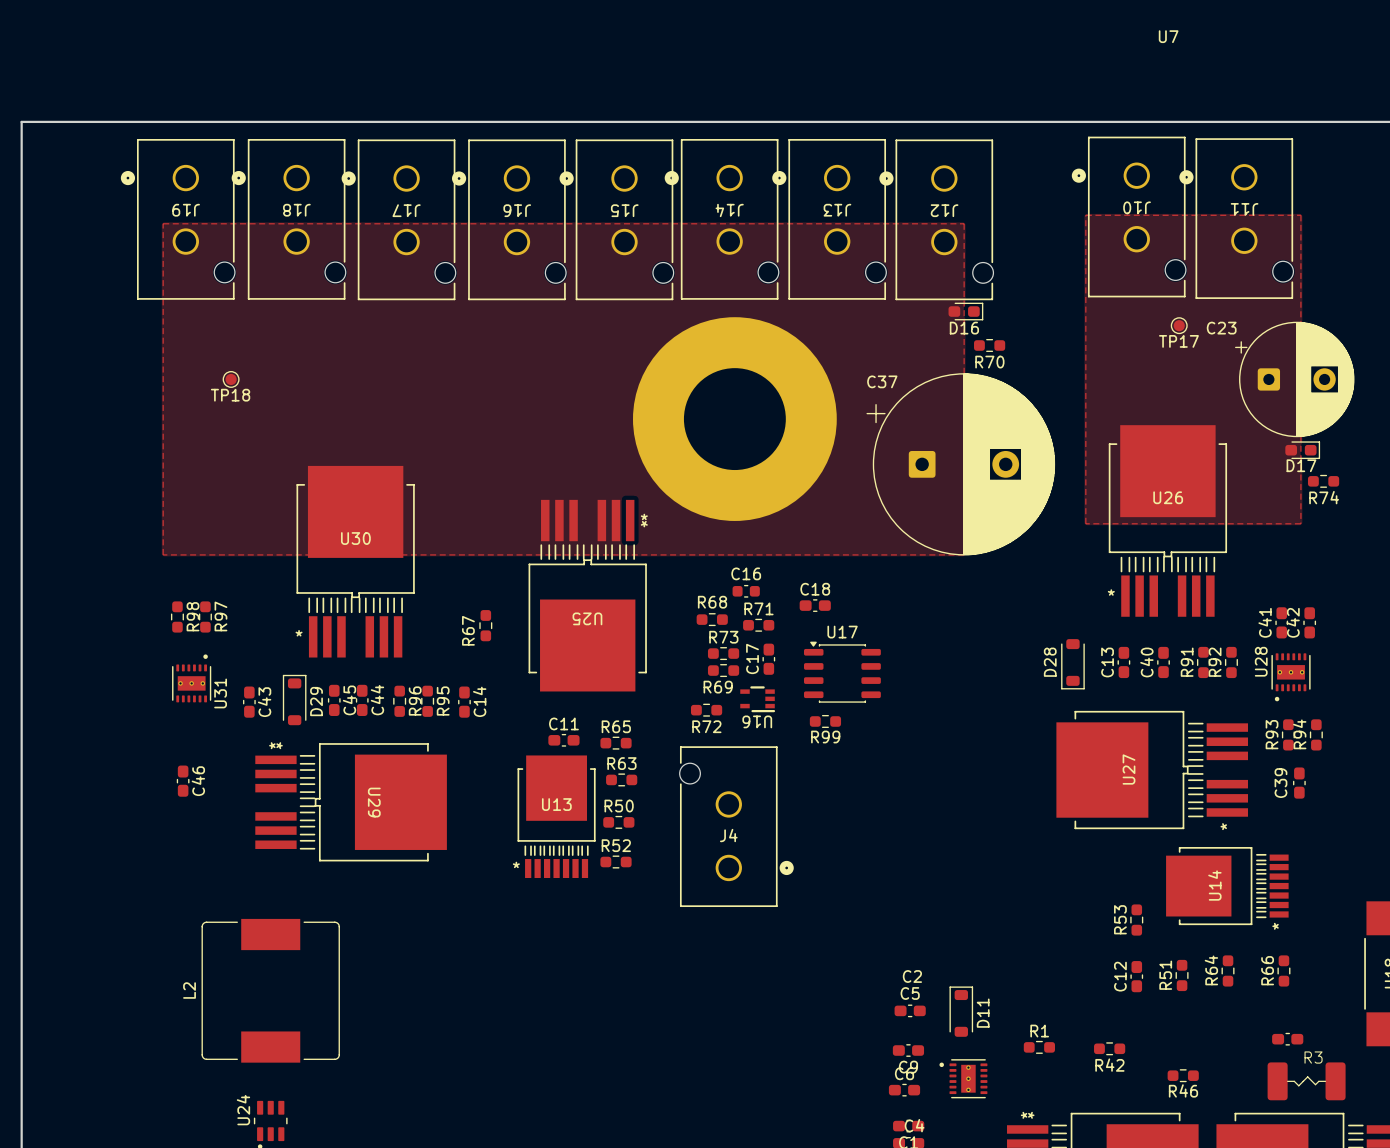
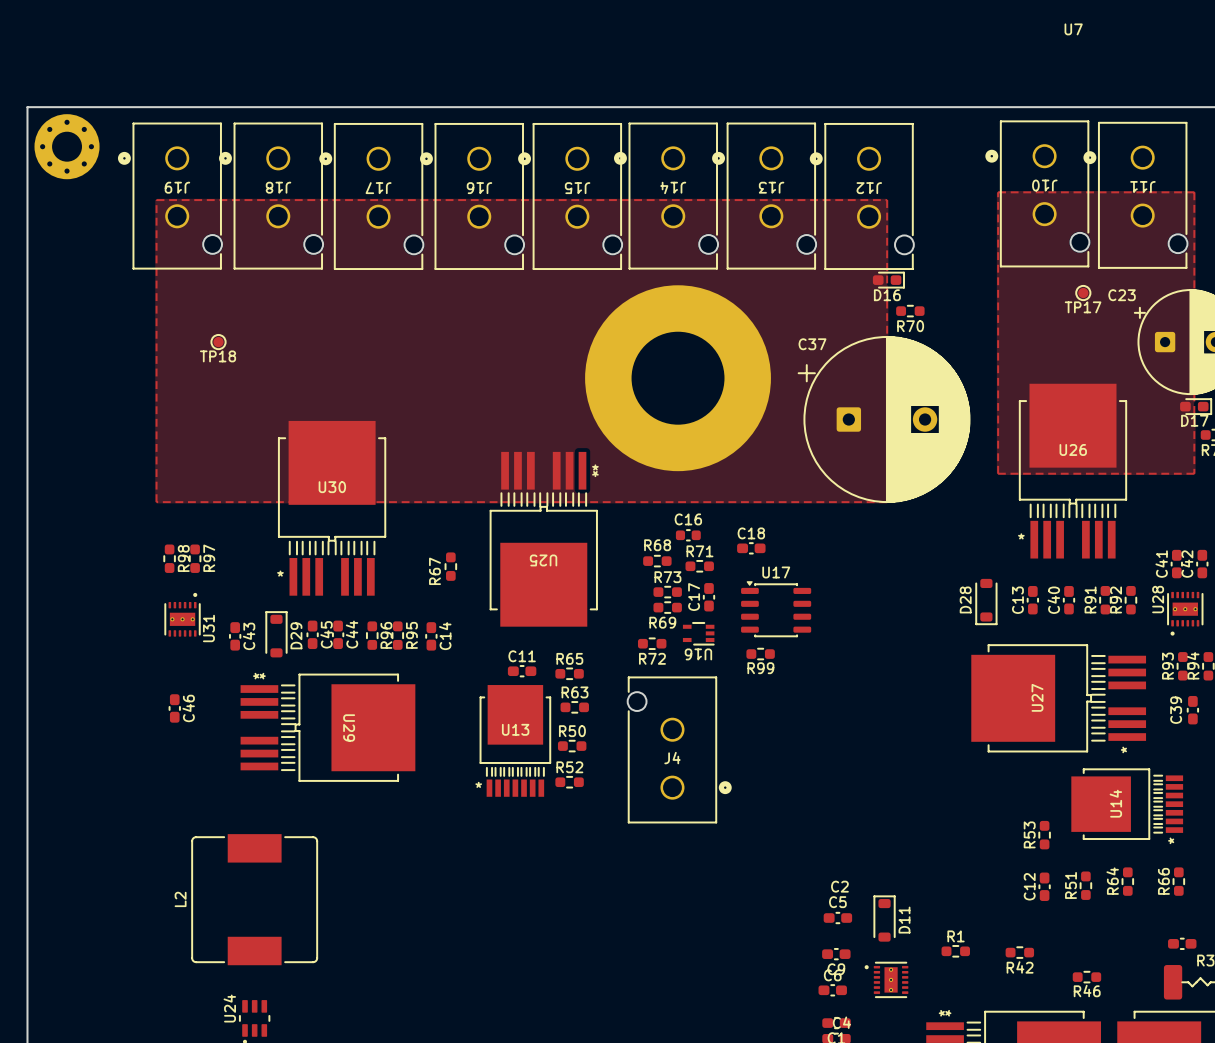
part: none -> (67, 146)

